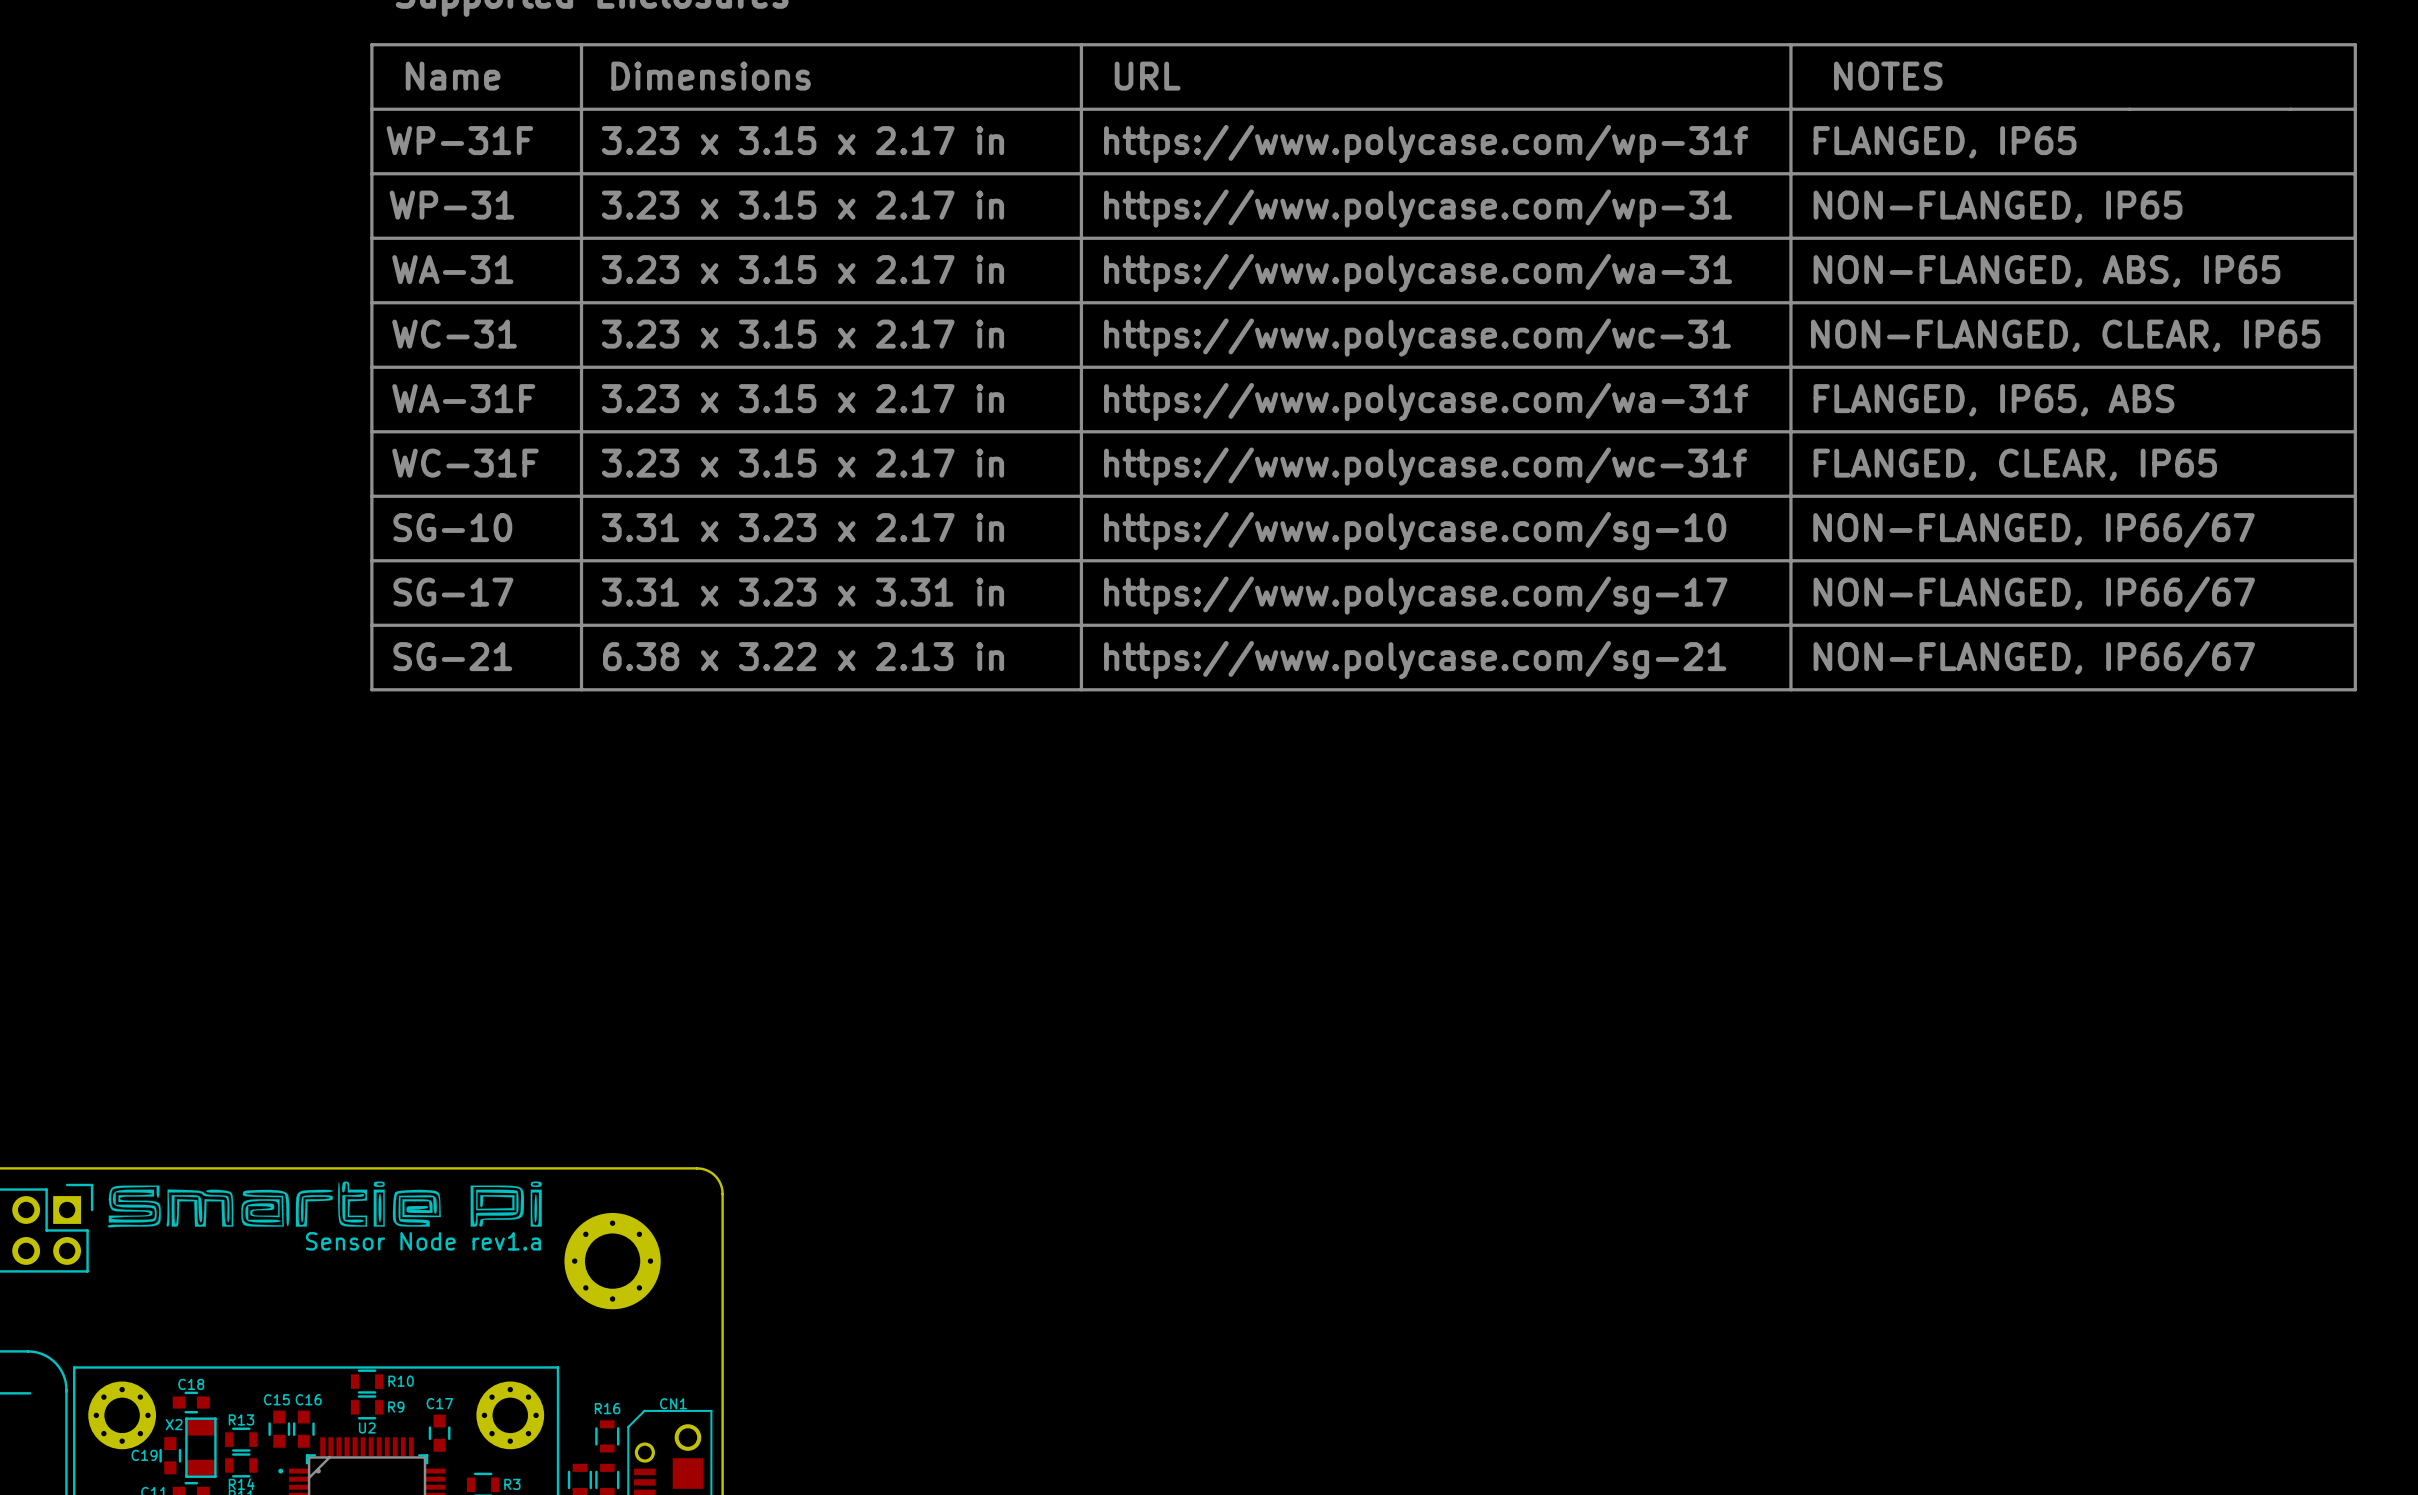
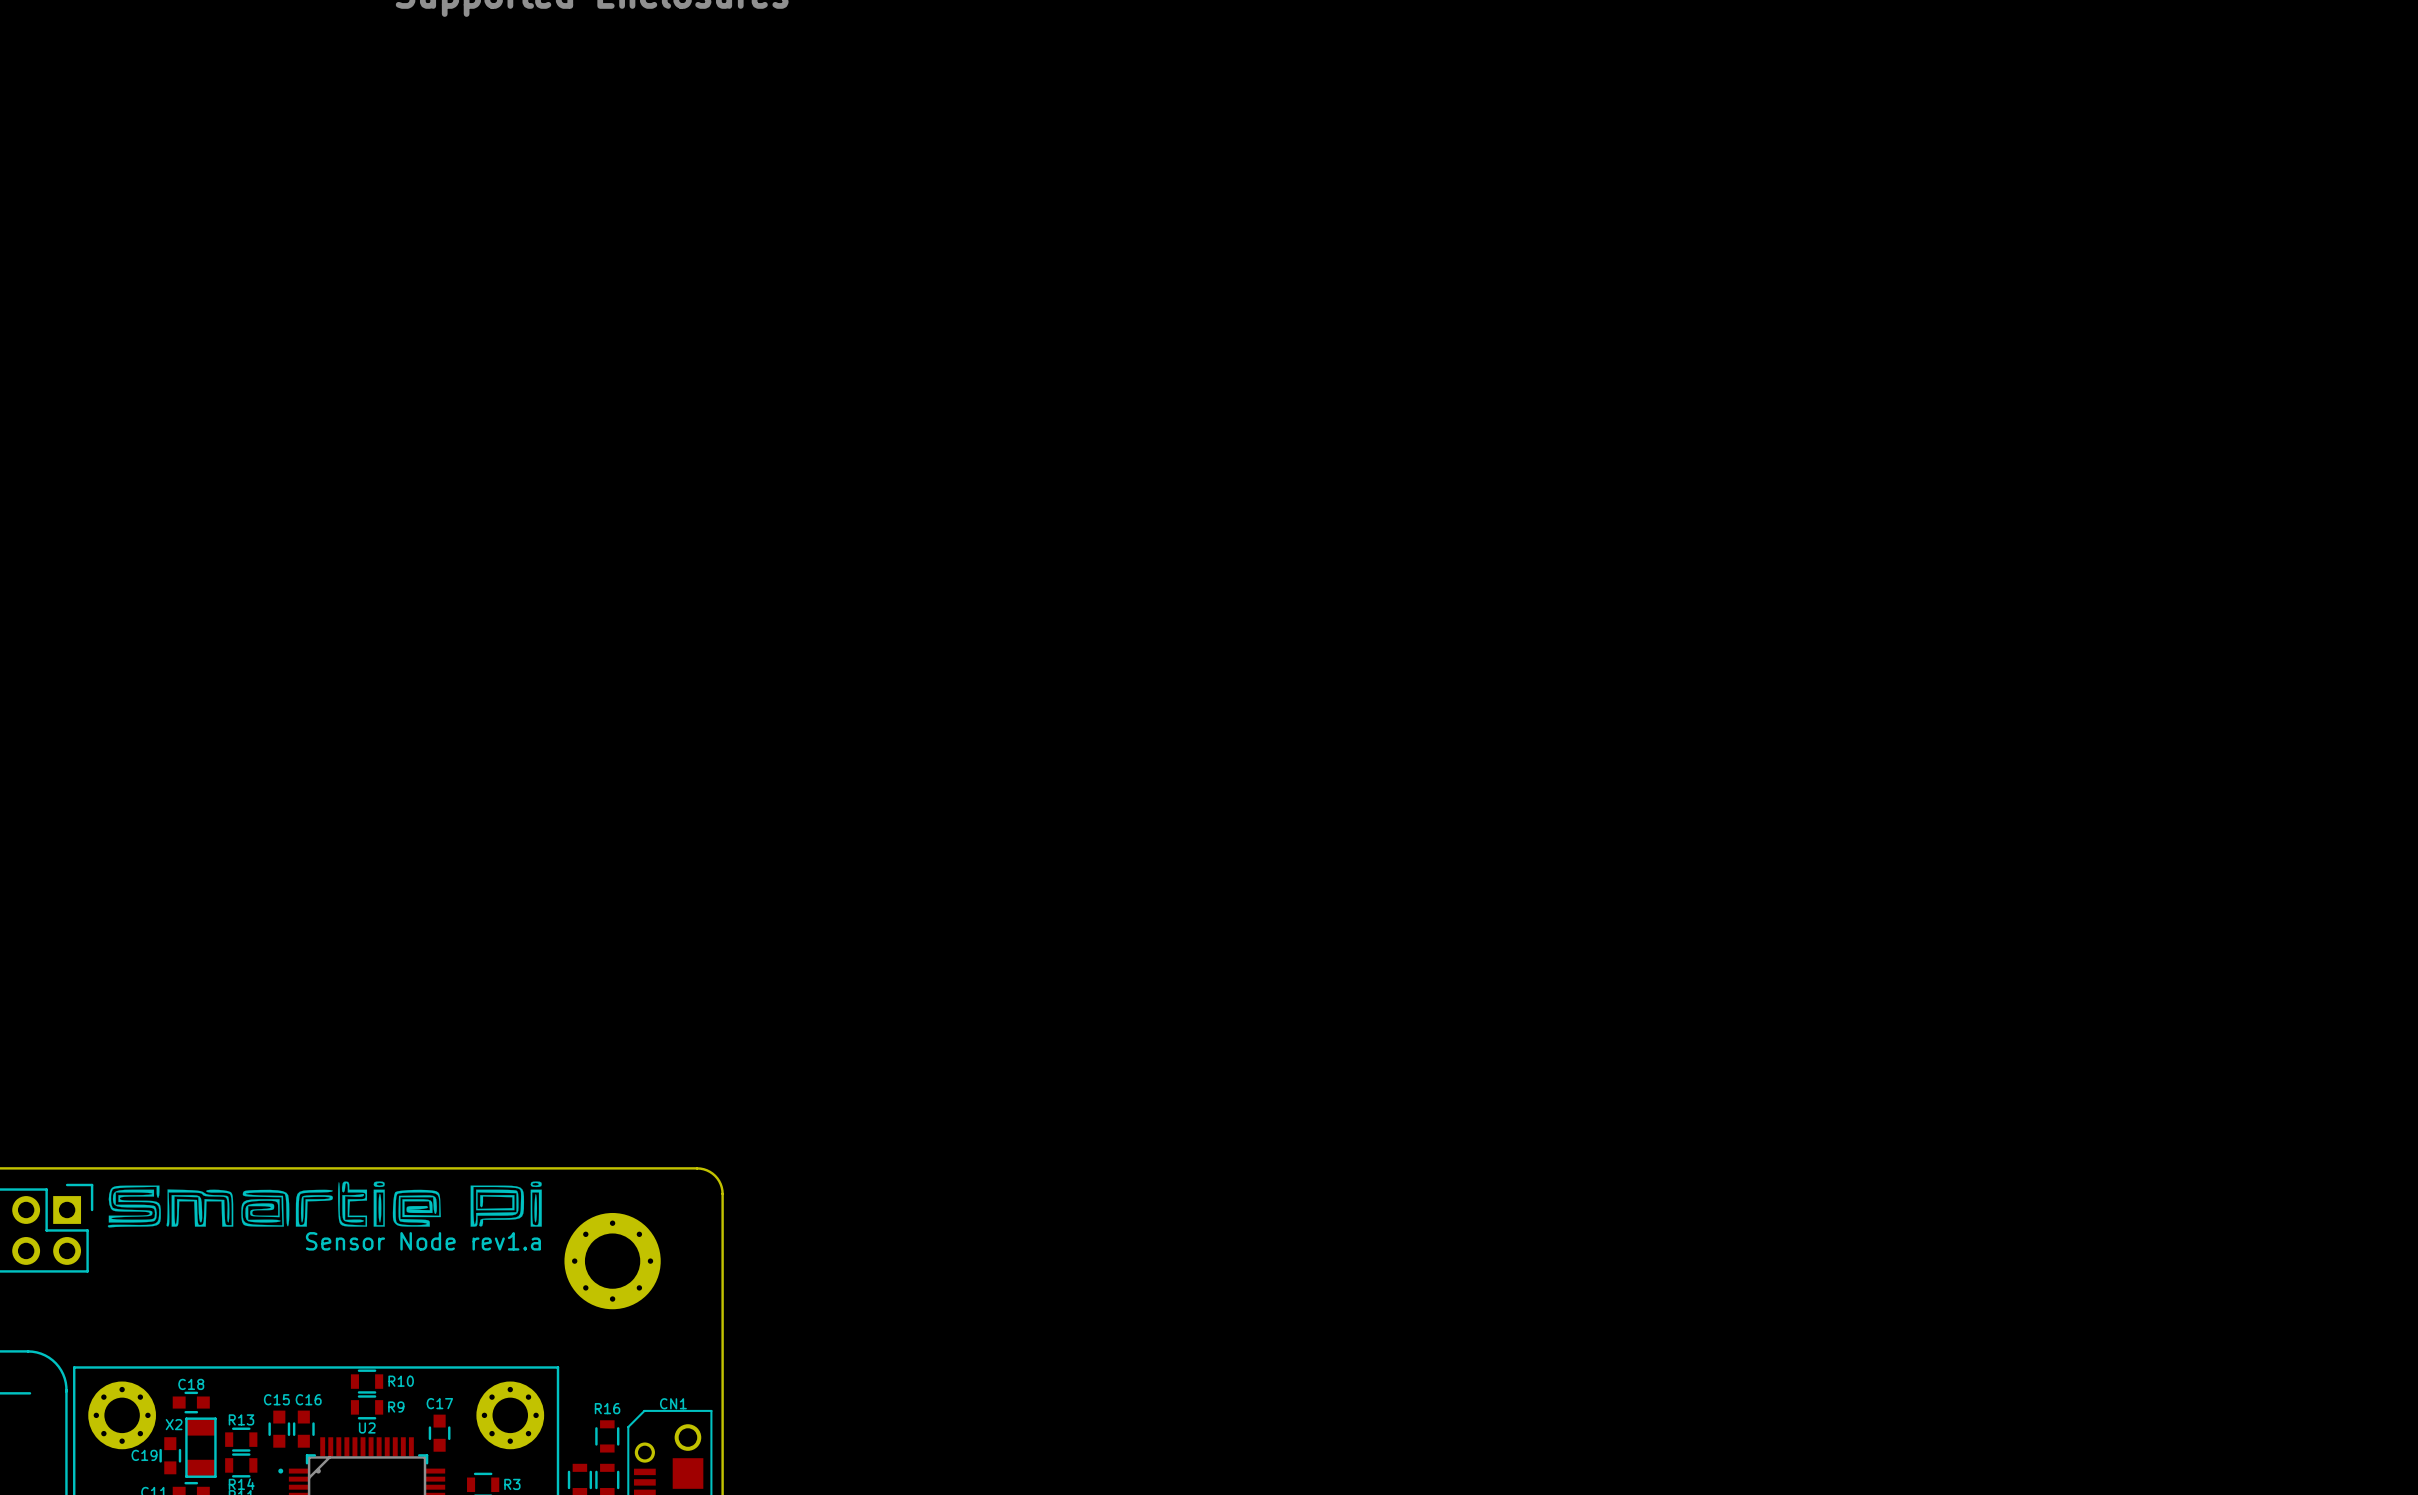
line: (371, 44) (2355, 44) (2355, 689) (371, 689) (371, 44) -> none
line: (581, 44) (581, 689) -> none
line: (1081, 44) (1081, 689) -> none
line: (1790, 44) (1790, 689) -> none
text: Name (453, 76) -> none
text: Dimensions (711, 76) -> none
text: URL (1147, 76) -> none
text: NOTES (1888, 76) -> none
line: (371, 109) (2355, 109) -> none
text: WP-31F (459, 140) -> none
text: 3.23 x 3.15 x 2.17 in (802, 140) -> none
text: FLANGED, IP65 (1945, 142) -> none
text: https://www.polycase.com/wp-31f (1426, 144) -> none
line: (371, 173) (2355, 173) -> none
text: WP-31 (451, 205) -> none
text: 3.23 x 3.15 x 2.17 in (802, 205) -> none
text: NON-FLANGED, IP65 (1998, 206) -> none
text: https://www.polycase.com/wp-31 (1418, 208) -> none
line: (371, 238) (2355, 238) -> none
text: WA-31 (452, 269) -> none
text: 3.23 x 3.15 x 2.17 in (802, 269) -> none
text: NON-FLANGED, ABS, IP65 (2046, 271) -> none
text: https://www.polycase.com/wa-31 (1418, 273) -> none
line: (371, 302) (2355, 302) -> none
text: WC-31 (454, 334) -> none
text: 3.23 x 3.15 x 2.17 in (802, 334) -> none
text: NON-FLANGED, CLEAR, IP65 (2065, 335) -> none
text: https://www.polycase.com/wc-31 (1417, 337) -> none
line: (371, 367) (2355, 367) -> none
text: WA-31F (463, 398) -> none
text: 3.23 x 3.15 x 2.17 in (802, 398) -> none
text: FLANGED, IP65, ABS (1993, 400) -> none
text: https://www.polycase.com/wa-31f (1426, 402) -> none
line: (371, 431) (2355, 431) -> none
text: WC-31F (465, 463) -> none
text: 3.23 x 3.15 x 2.17 in (802, 463) -> none
text: FLANGED, CLEAR, IP65 (2015, 464) -> none
text: https://www.polycase.com/wc-31f (1425, 466) -> none
line: (371, 496) (2355, 496) -> none
text: SG-10 (452, 527) -> none
text: 3.31 x 3.23 x 2.17 in (802, 527) -> none
text: NON-FLANGED, IP66/67 (2033, 529) -> none
text: https://www.polycase.com/sg-10 (1415, 531) -> none
line: (371, 560) (2355, 560) -> none
text: SG-17 (453, 592) -> none
text: 3.31 x 3.23 x 3.31 in (802, 592) -> none
text: NON-FLANGED, IP66/67 (2034, 594) -> none
text: https://www.polycase.com/sg-17 (1415, 595) -> none
line: (371, 625) (2355, 625) -> none
text: SG-21 (452, 656) -> none
text: 6.38 x 3.22 x 2.13 in (803, 656) -> none
text: NON-FLANGED, IP66/67 (2034, 658) -> none
text: https://www.polycase.com/sg-21 (1415, 660) -> none

